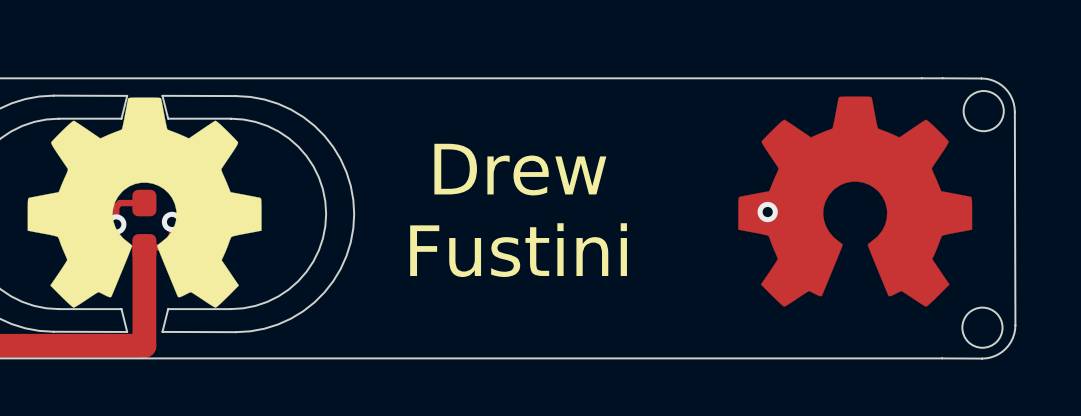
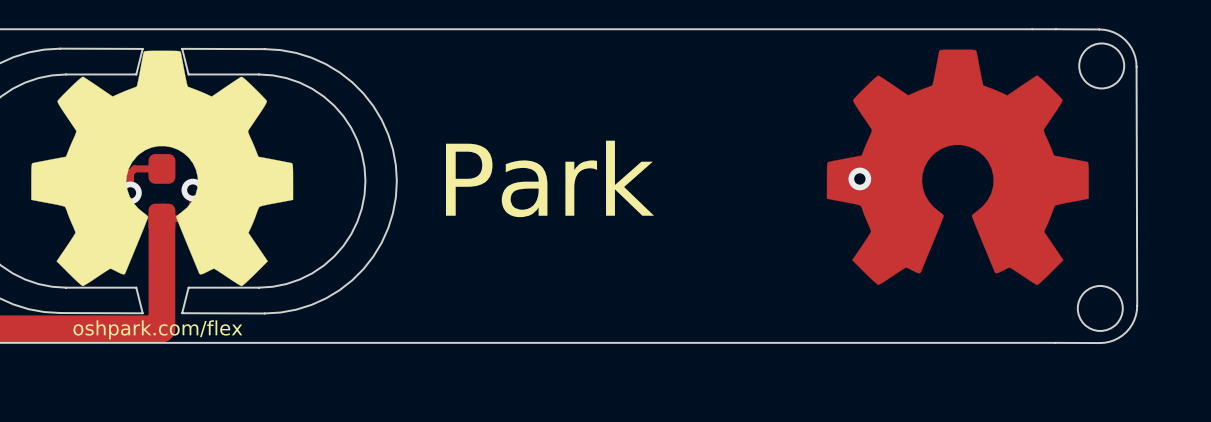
text: Drew (520, 169) -> none
text: none -> Park (549, 178)
text: Fustini (518, 250) -> none
text: none -> oshpark.com/flex (157, 329)

